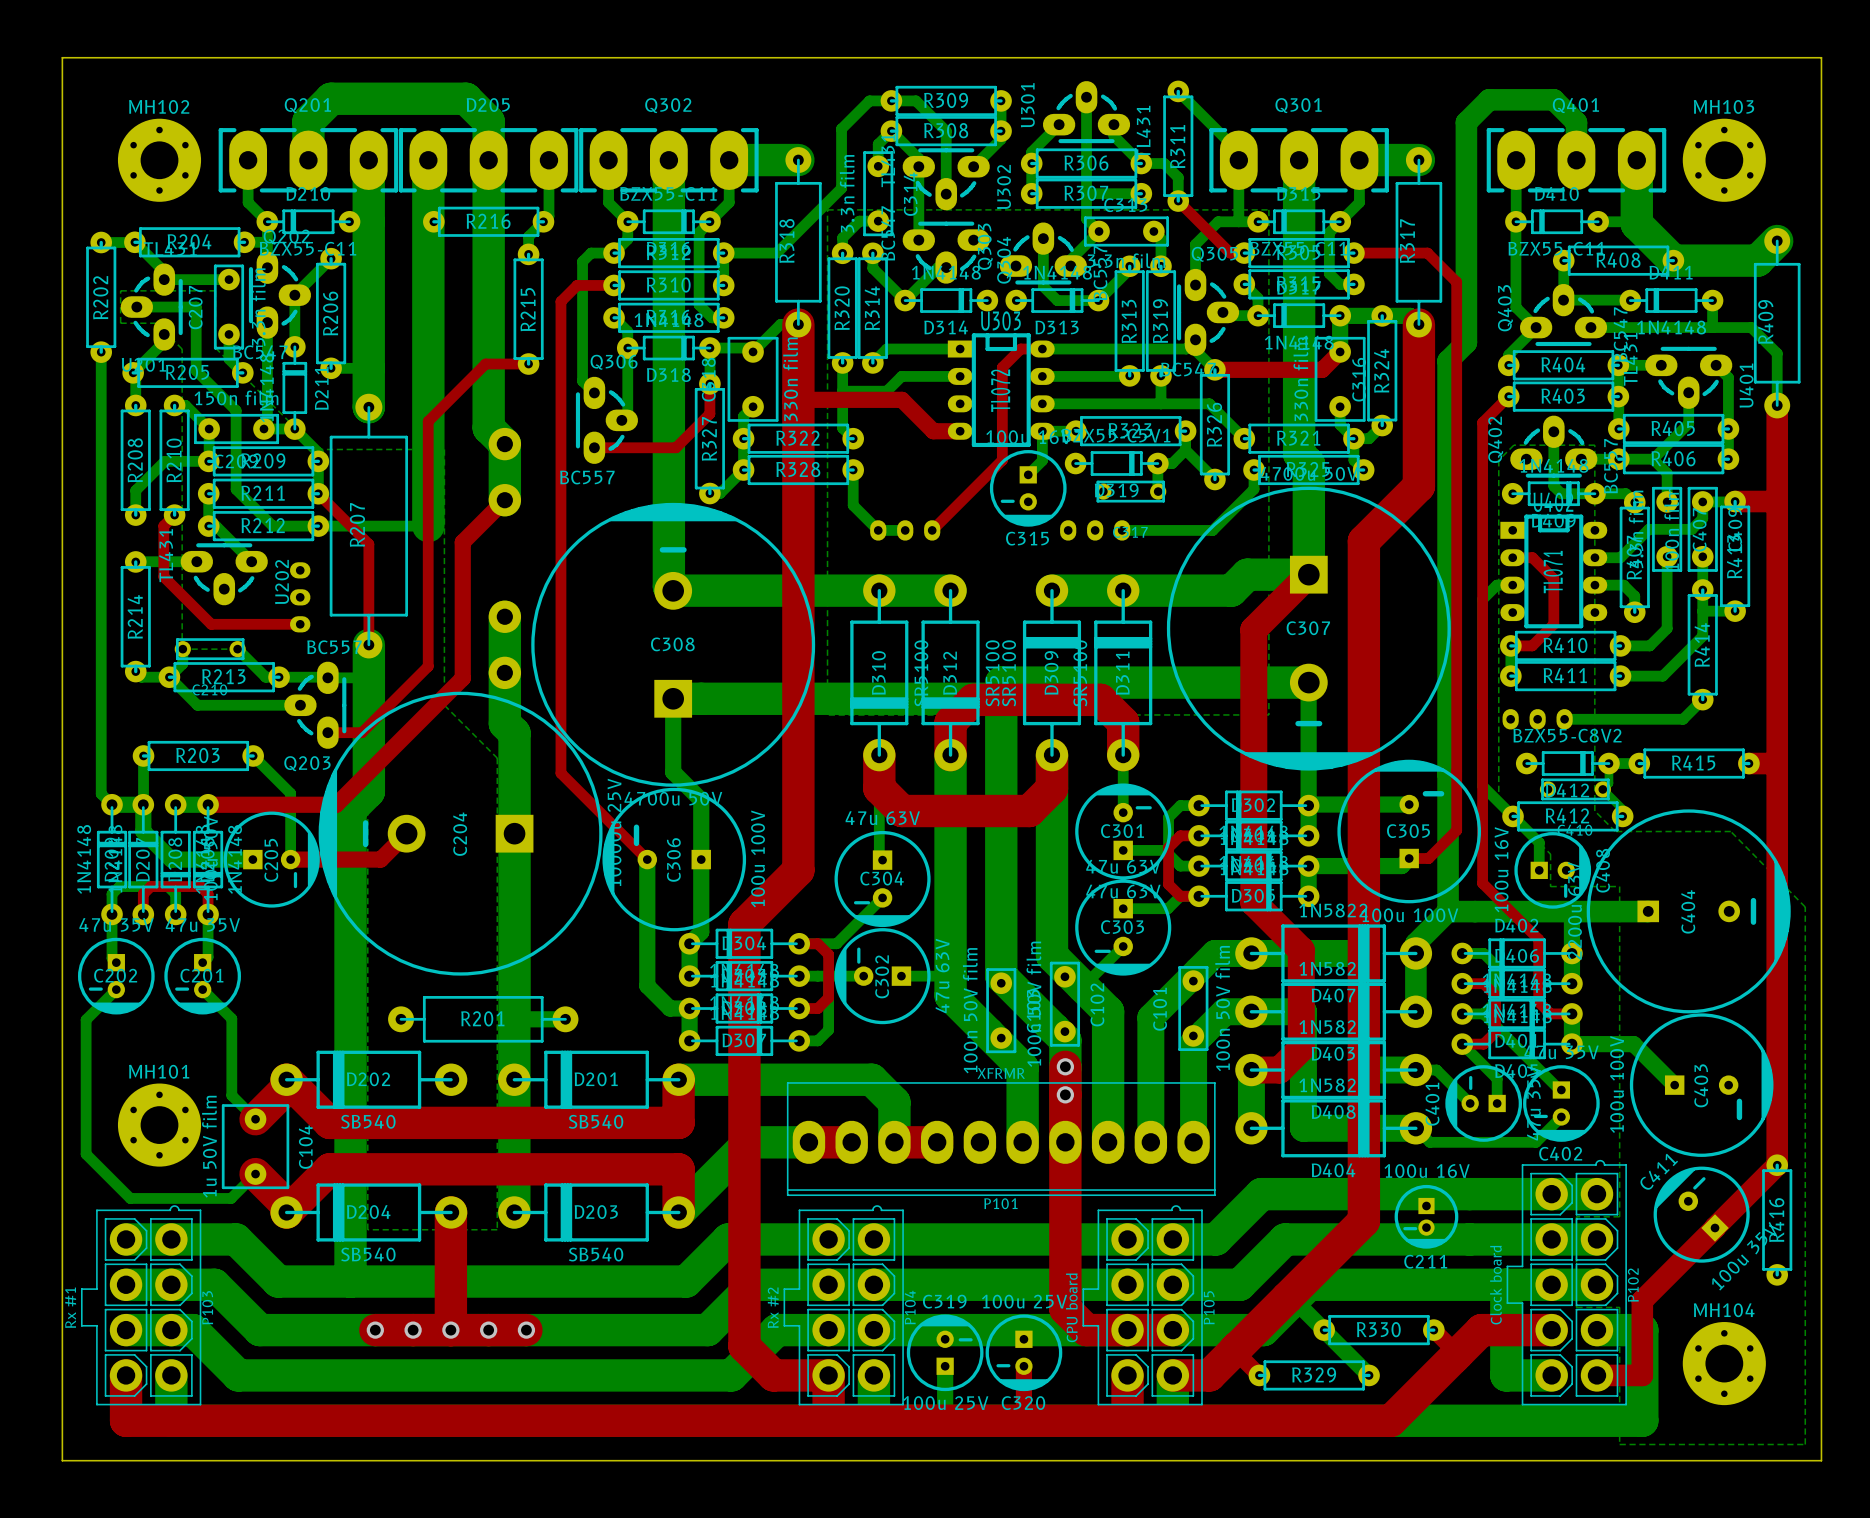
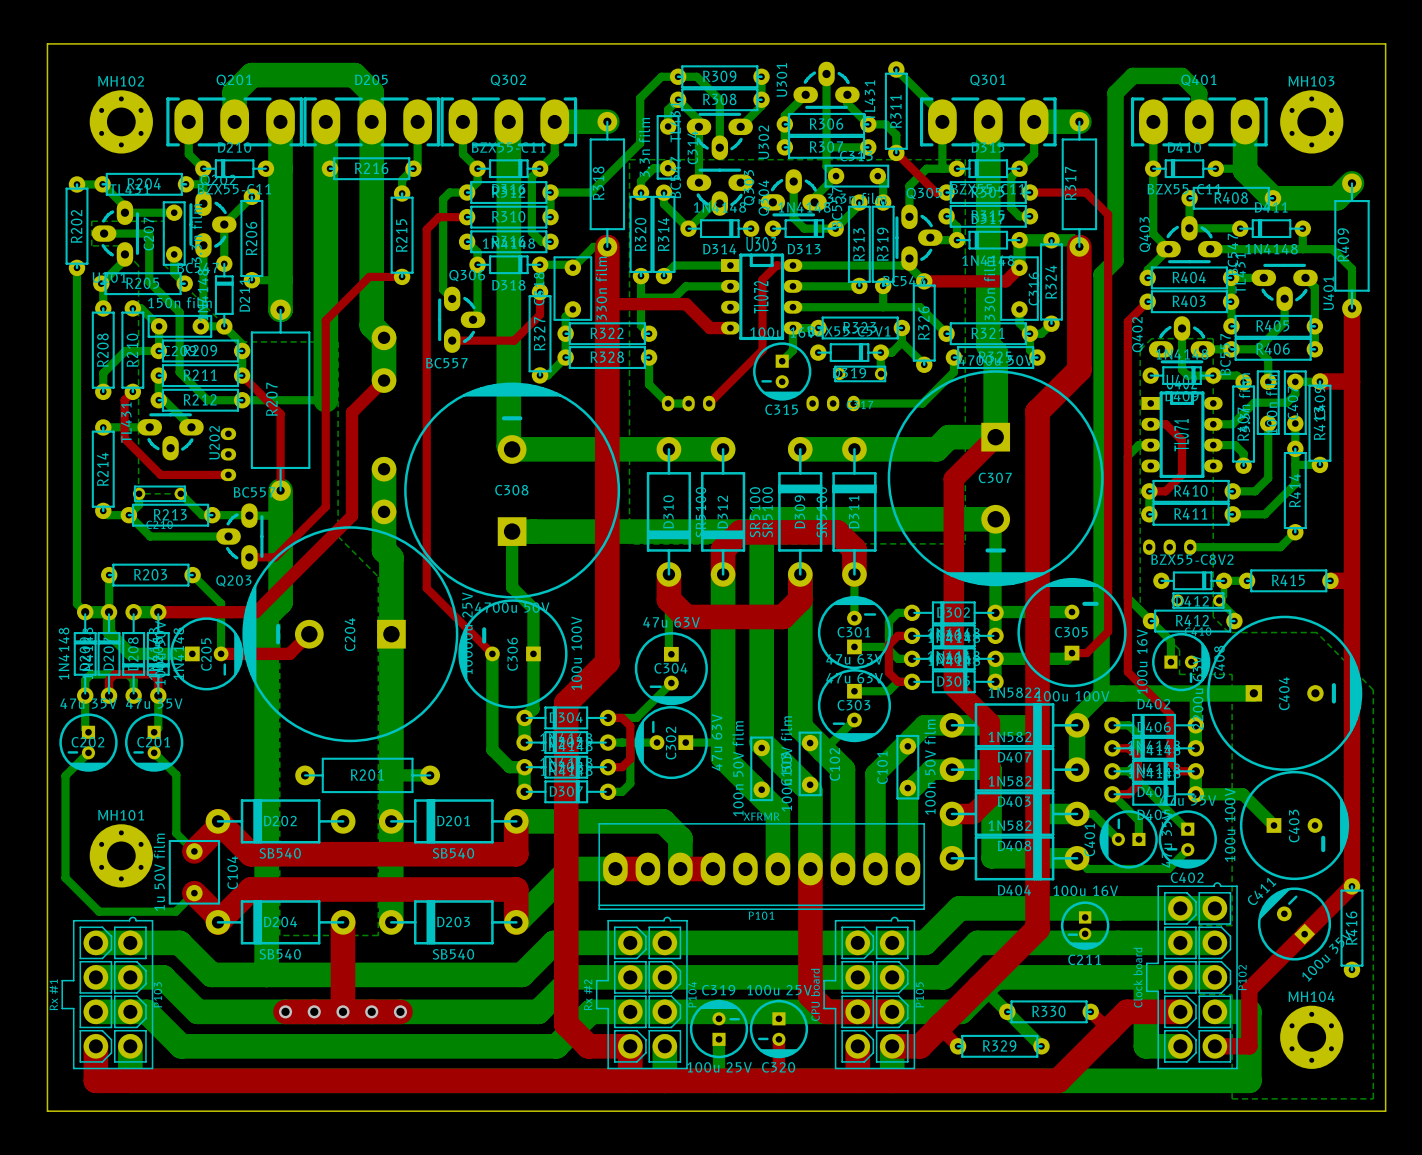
top track: (1065, 1066) (1065, 1142) -> none
via: (1065, 1066) -> none
via: (1065, 1094) -> none

